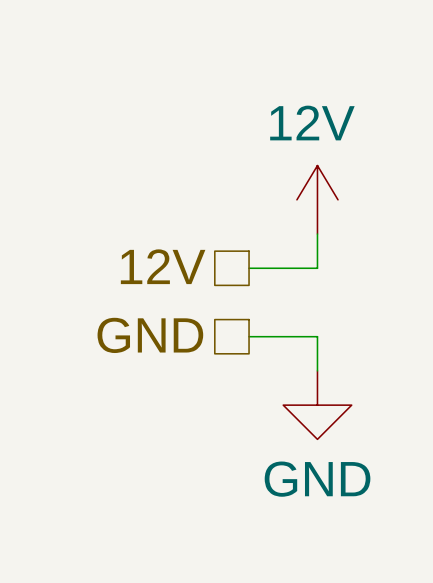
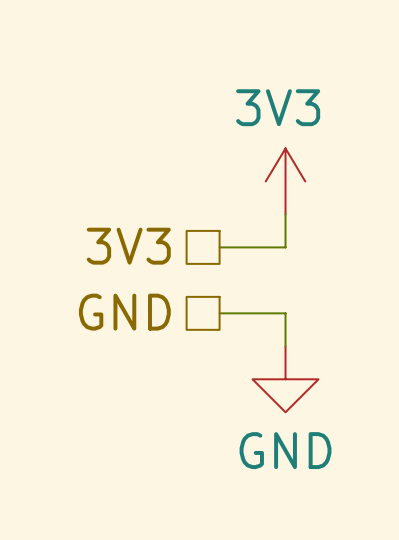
power symbol: 12V (317, 199) -> 3V3 (285, 181)
hierarchical label: 12V (163, 266) -> 3V3 (128, 246)

